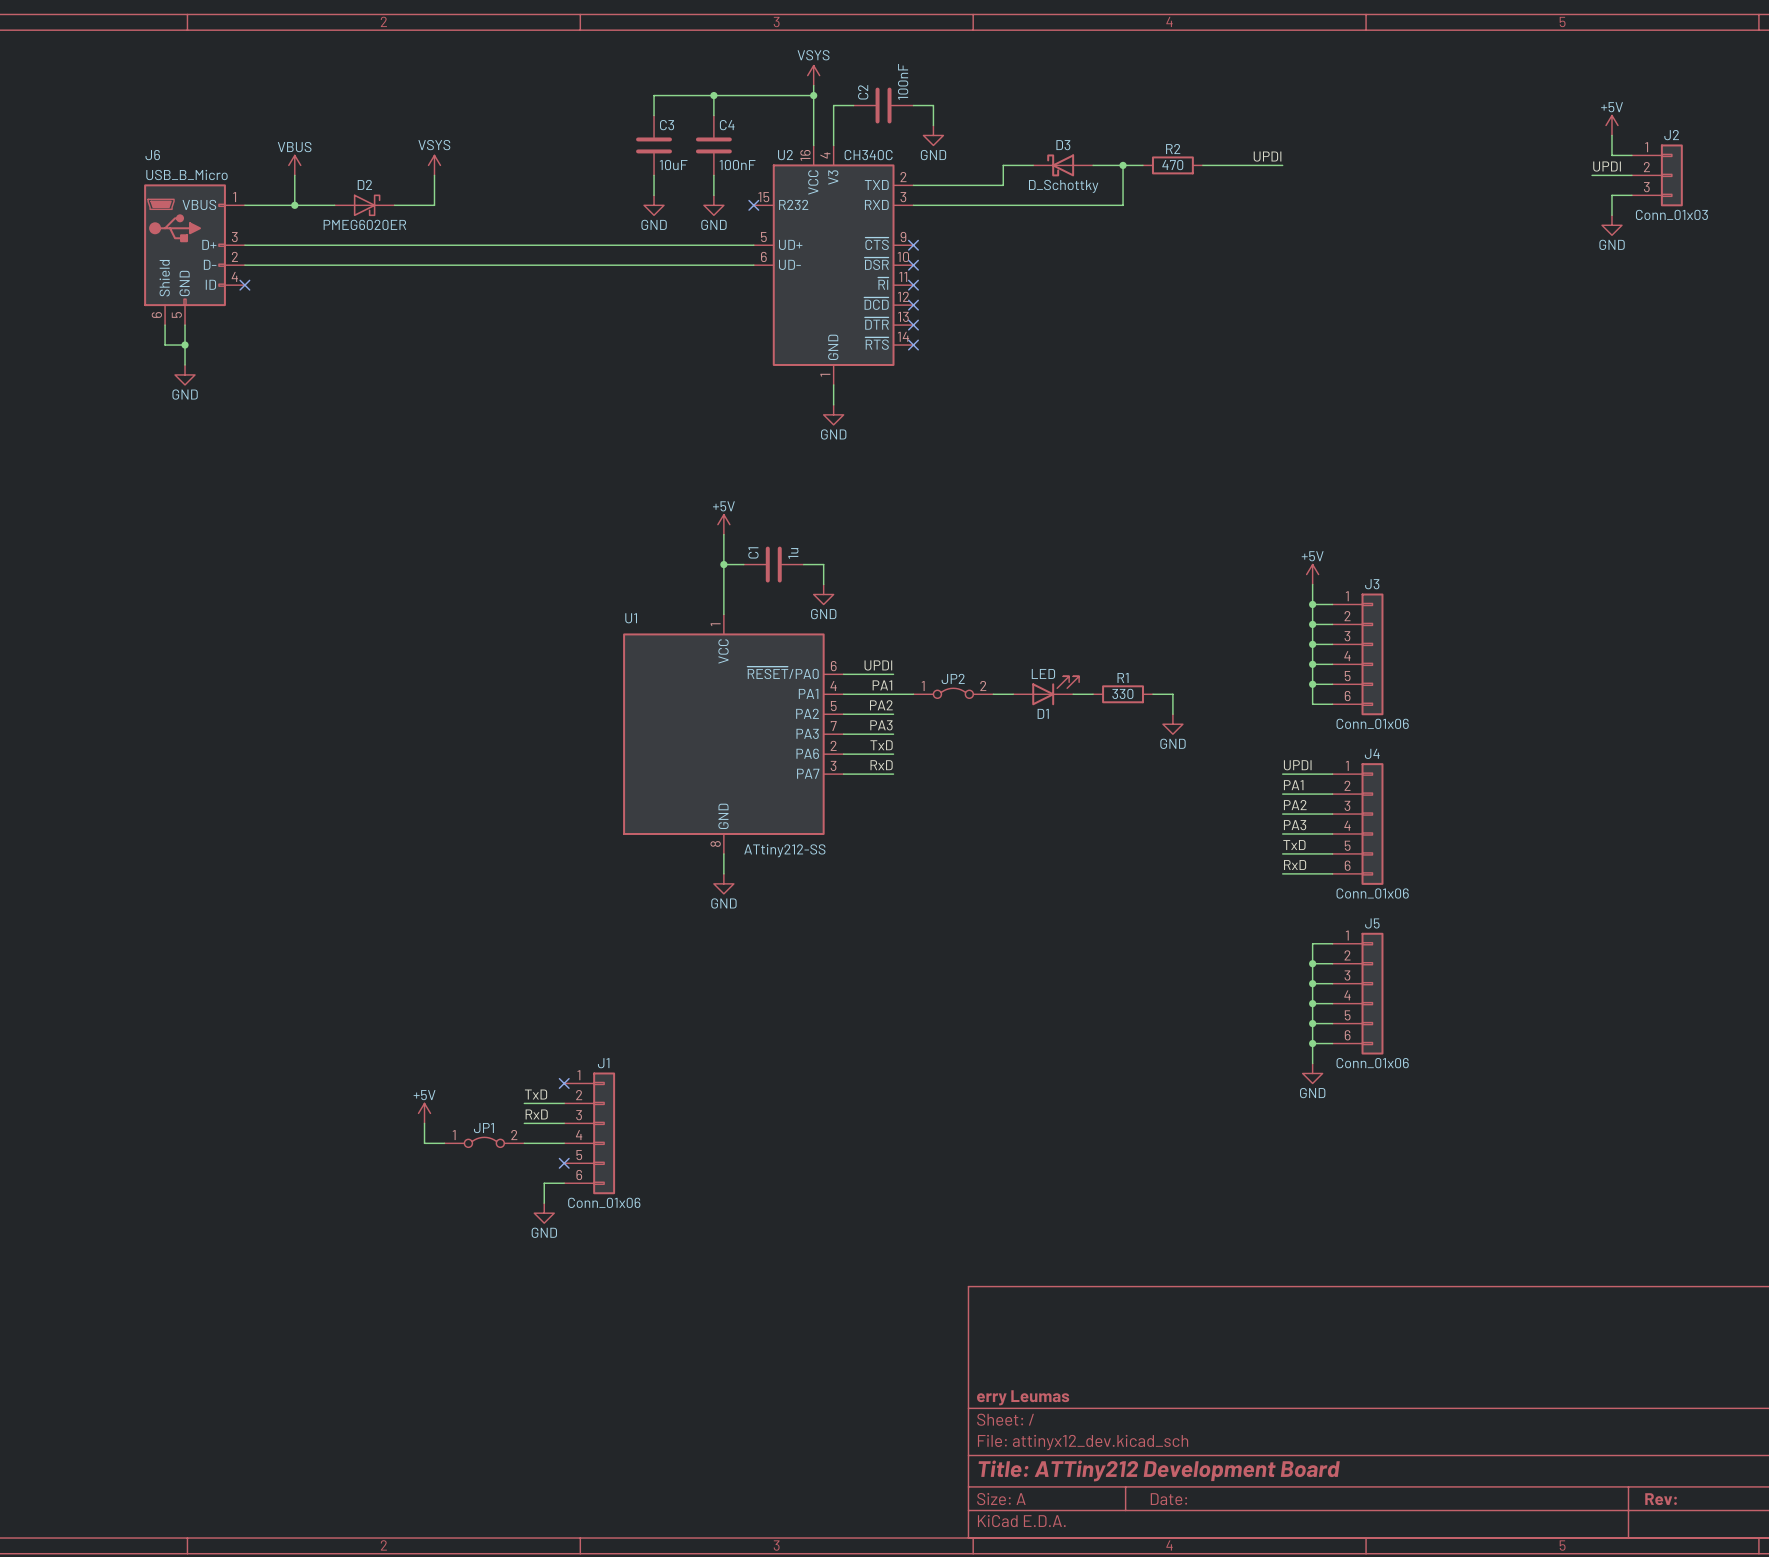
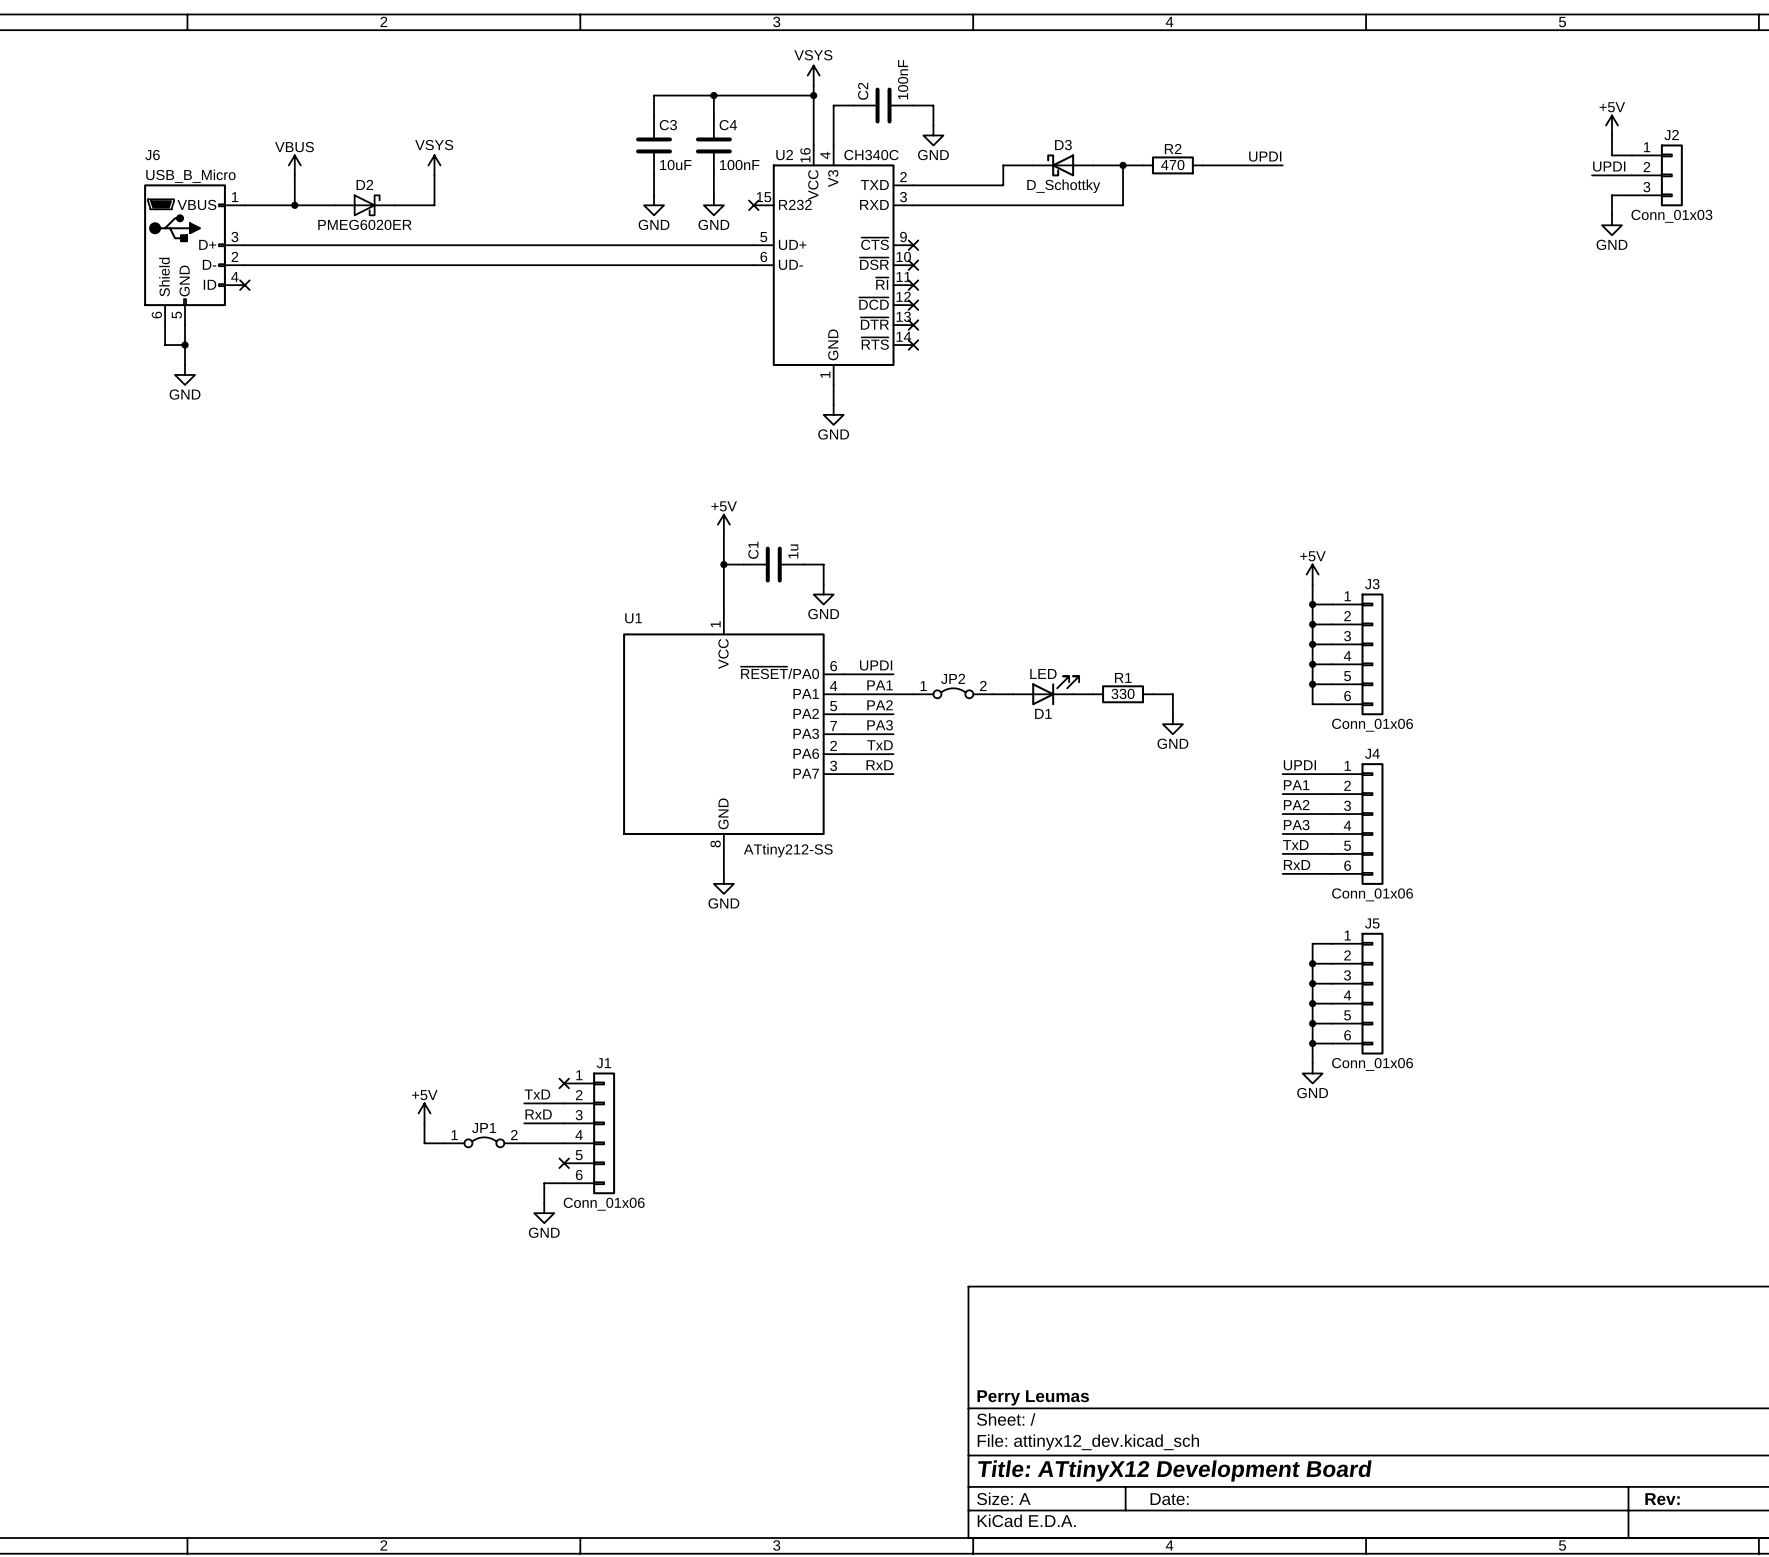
title block: erry Leumas (1023, 1397) -> Perry Leumas (1033, 1397)
title block: Title: ATTiny212 Development Board (1159, 1470) -> Title: ATtinyX12 Development Board (1174, 1471)

